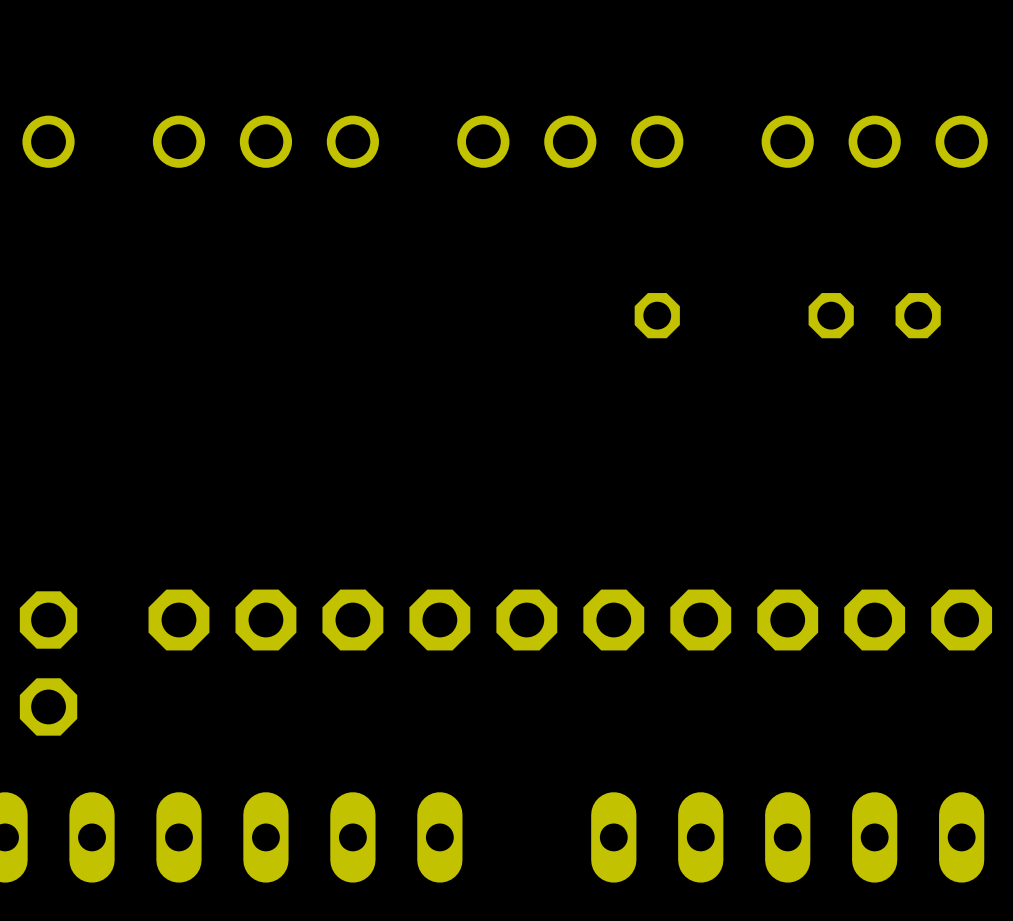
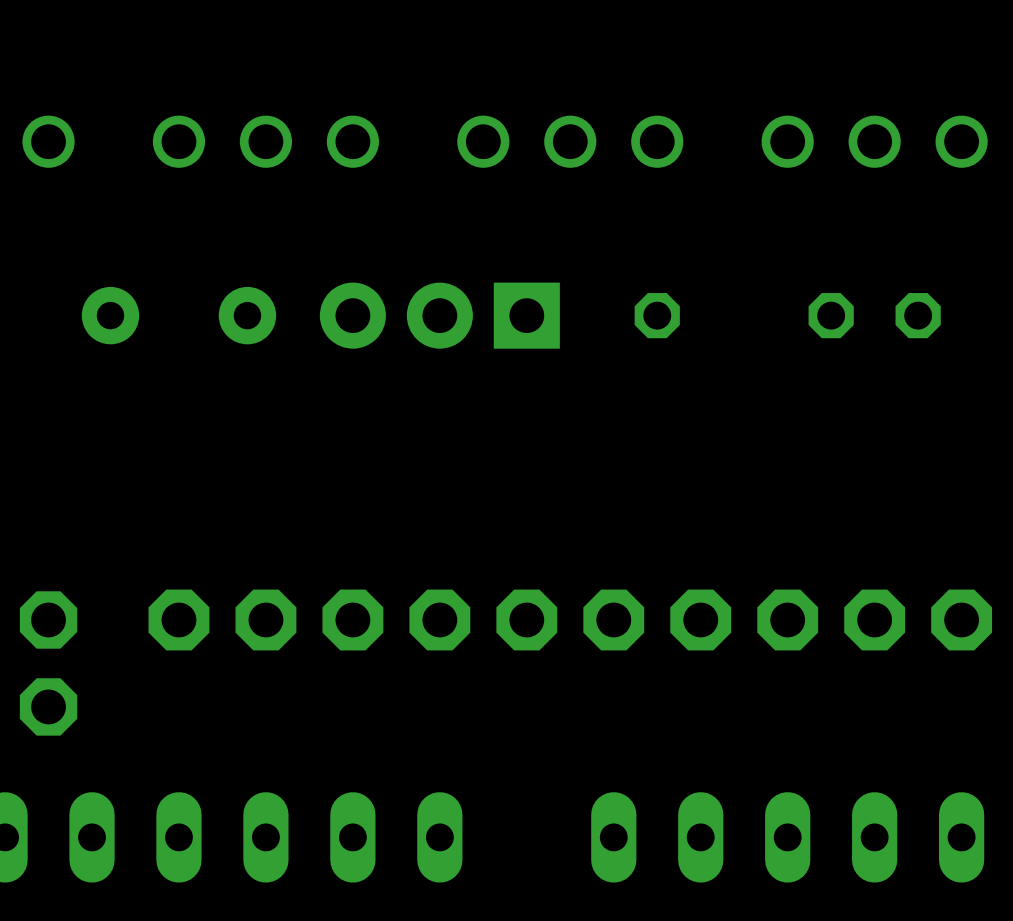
part: none -> (178, 315)
part: none -> (439, 315)

